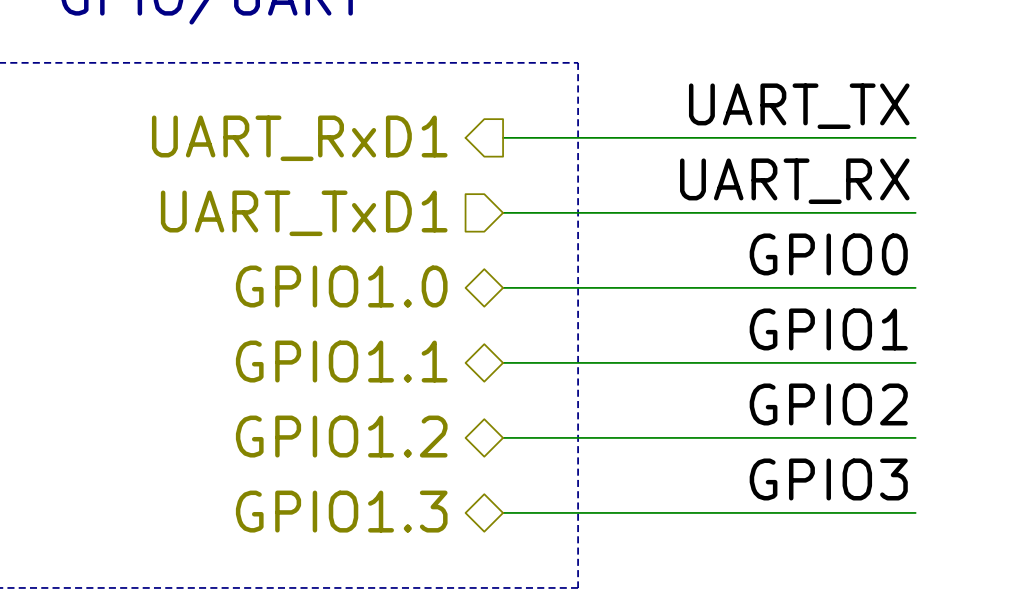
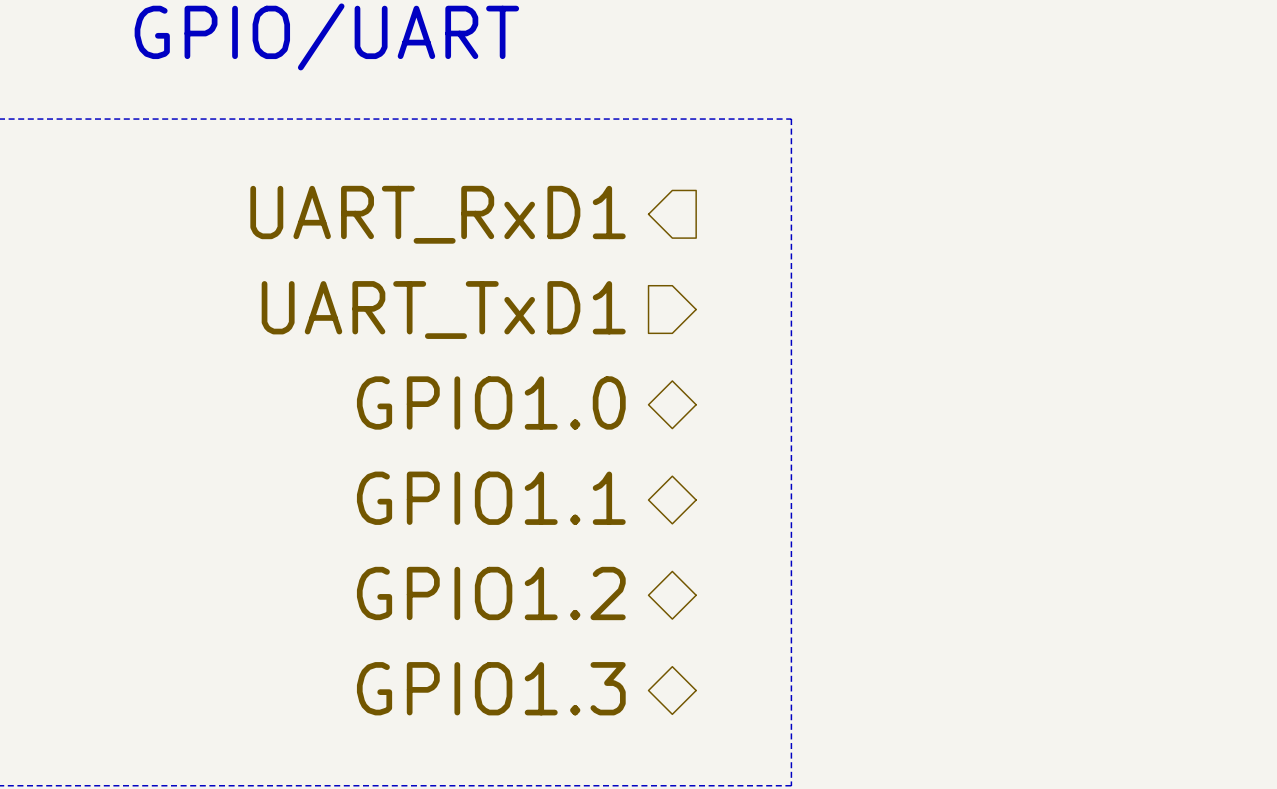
label: UART_TX (799, 106) -> none
wire: (503, 137) (915, 137) -> none
label: UART_RX (794, 181) -> none
wire: (503, 212) (915, 212) -> none
label: GPIO0 (828, 254) -> none
wire: (503, 287) (915, 287) -> none
label: GPIO1 (828, 329) -> none
wire: (503, 362) (915, 362) -> none
label: GPIO2 (828, 404) -> none
wire: (503, 437) (915, 437) -> none
label: GPIO3 (828, 479) -> none
wire: (503, 512) (915, 512) -> none

